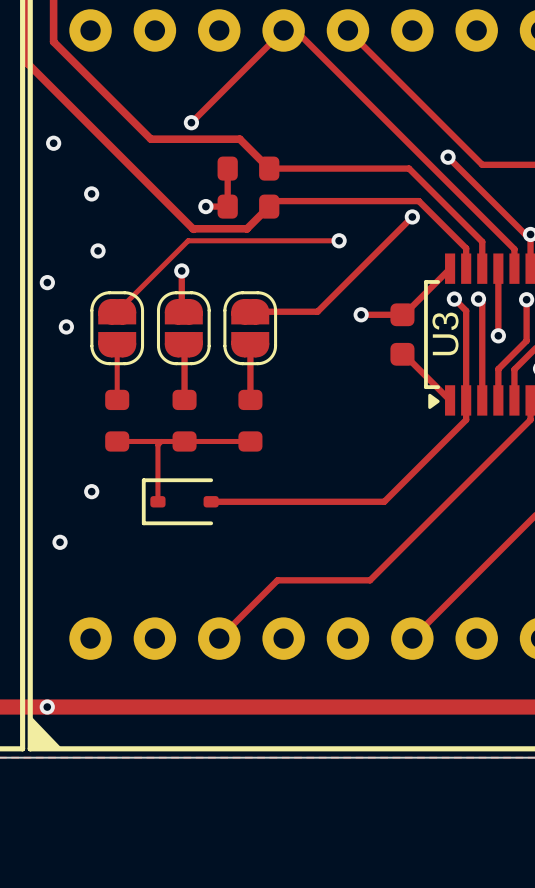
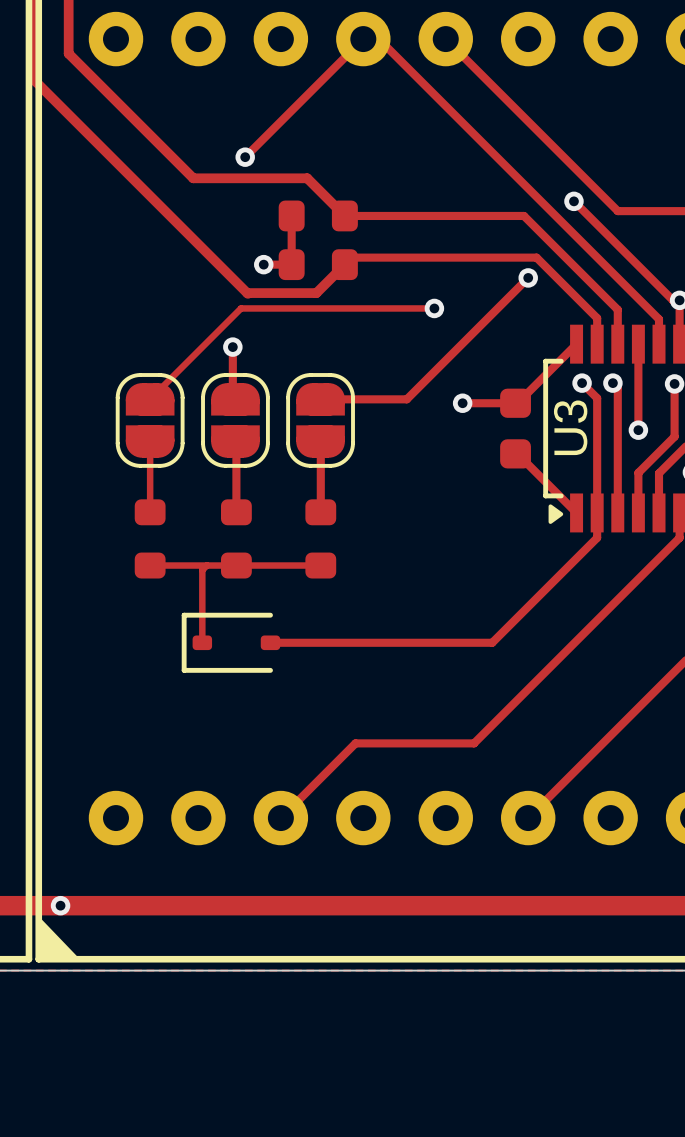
via: (53, 143) -> none
via: (91, 193) -> none
via: (98, 250) -> none
via: (47, 282) -> none
via: (66, 326) -> none
via: (91, 491) -> none
via: (60, 542) -> none

